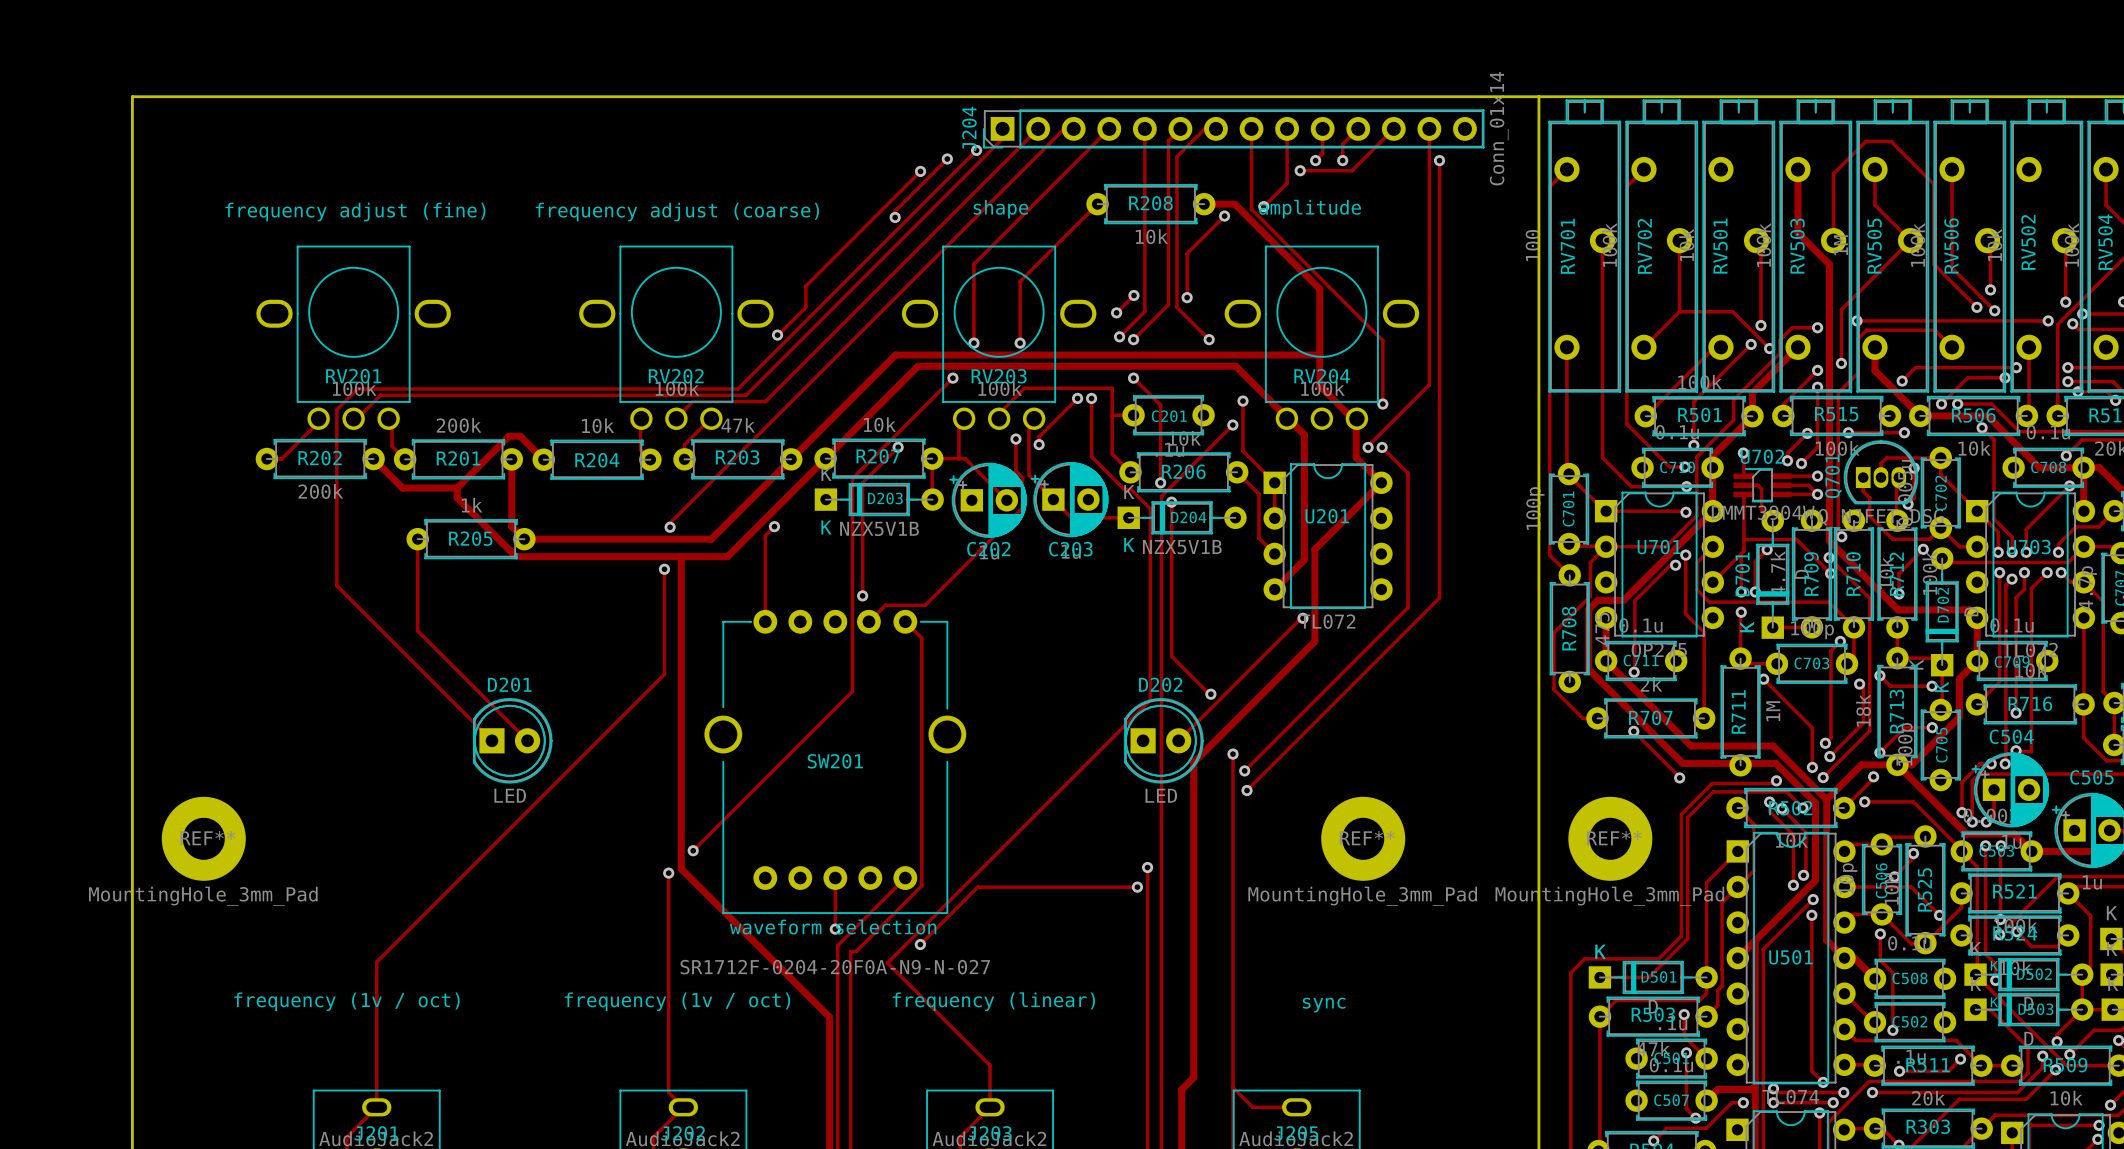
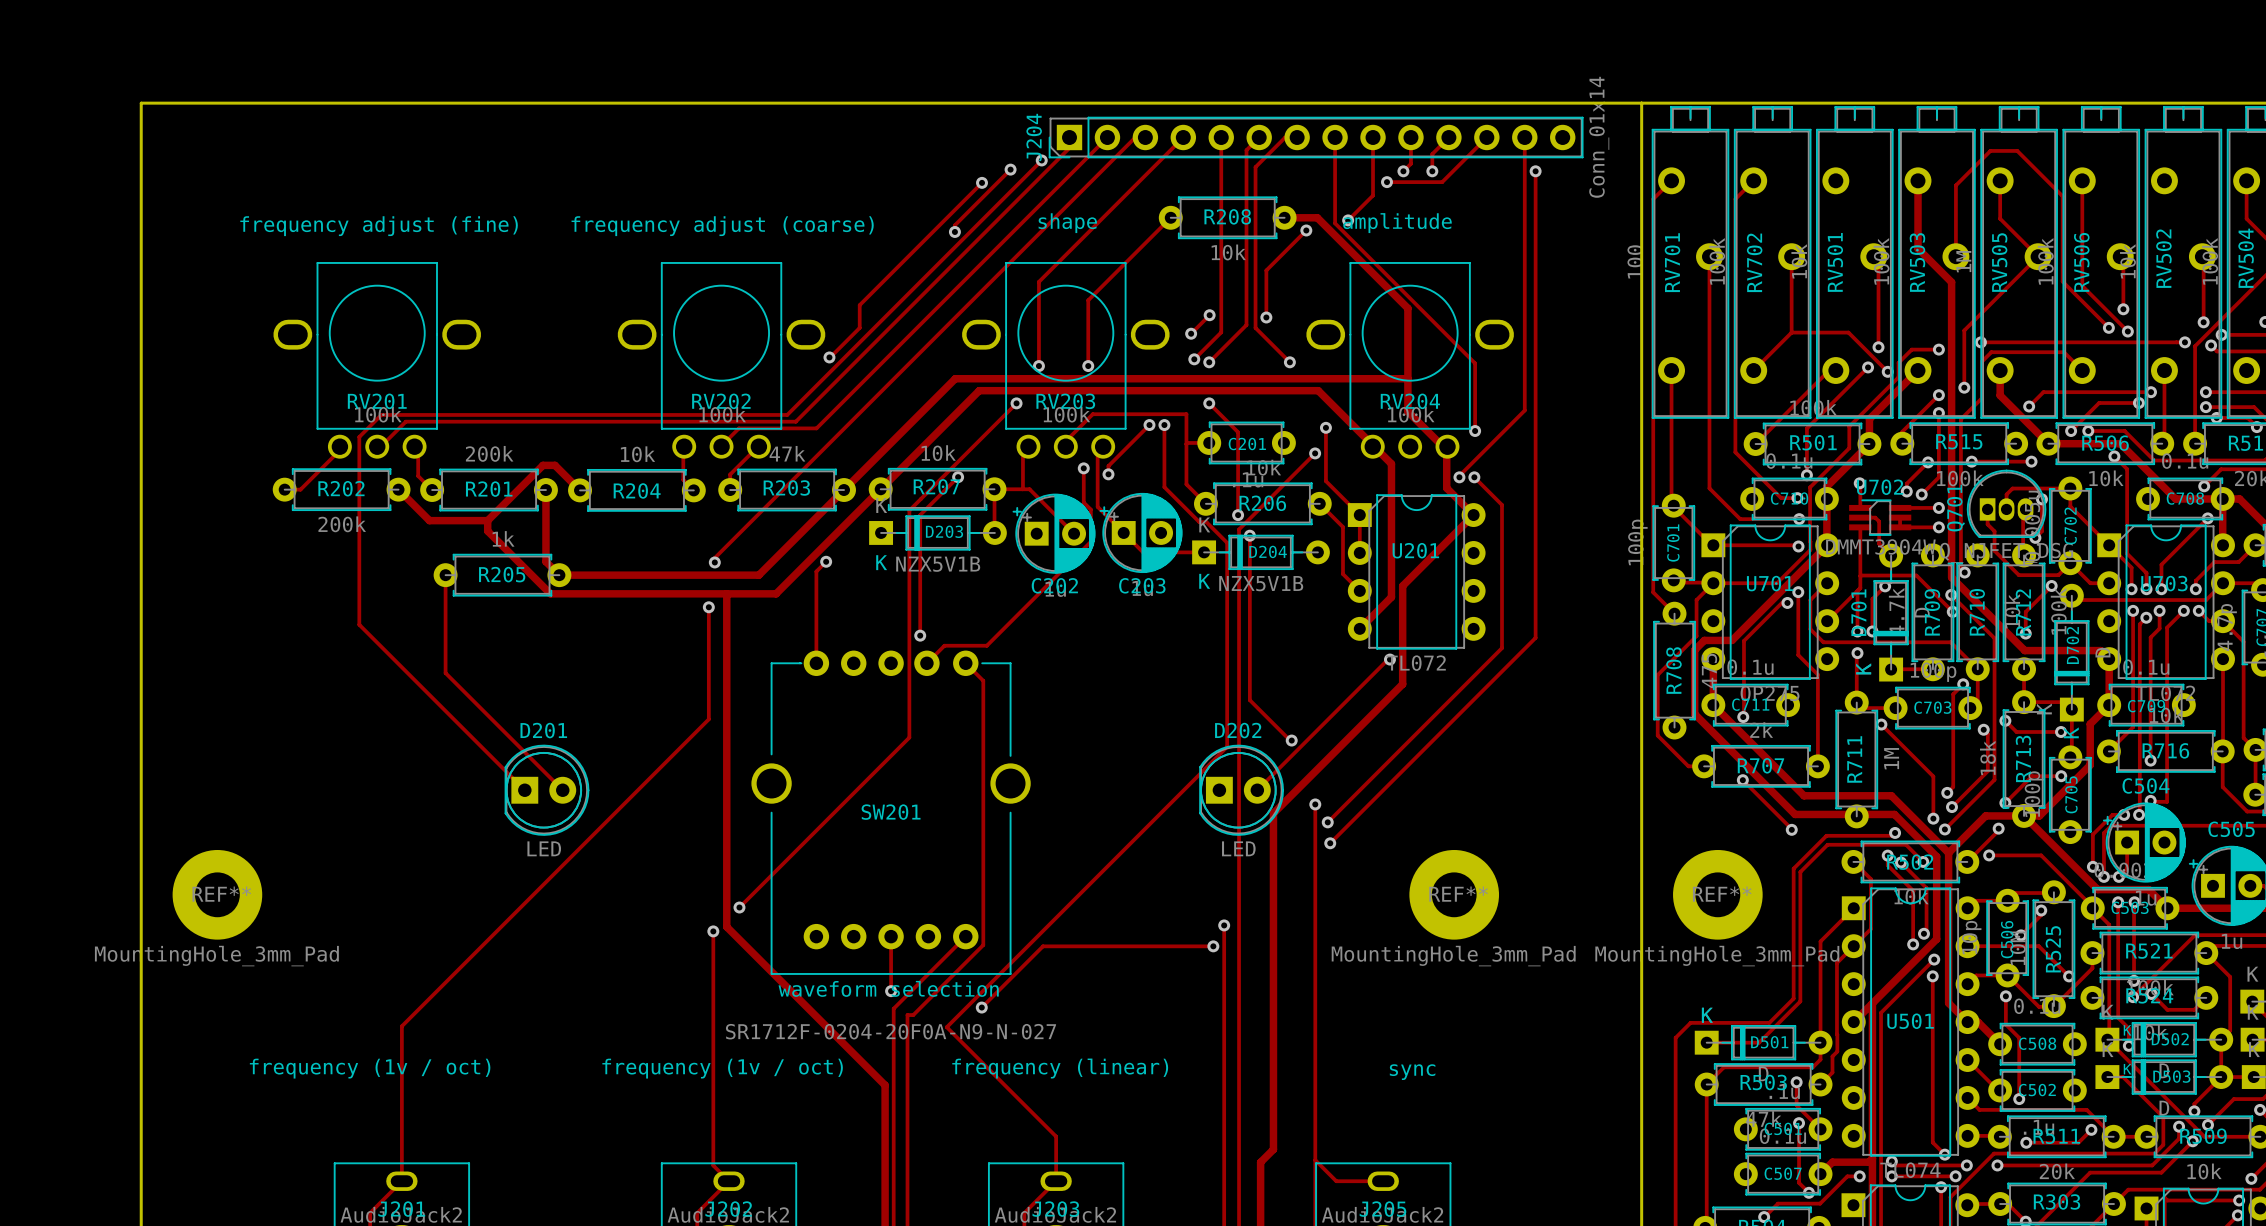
track: (1781, 485) (1808, 485) (1817, 494) -> (1900, 517) (1900, 527)

